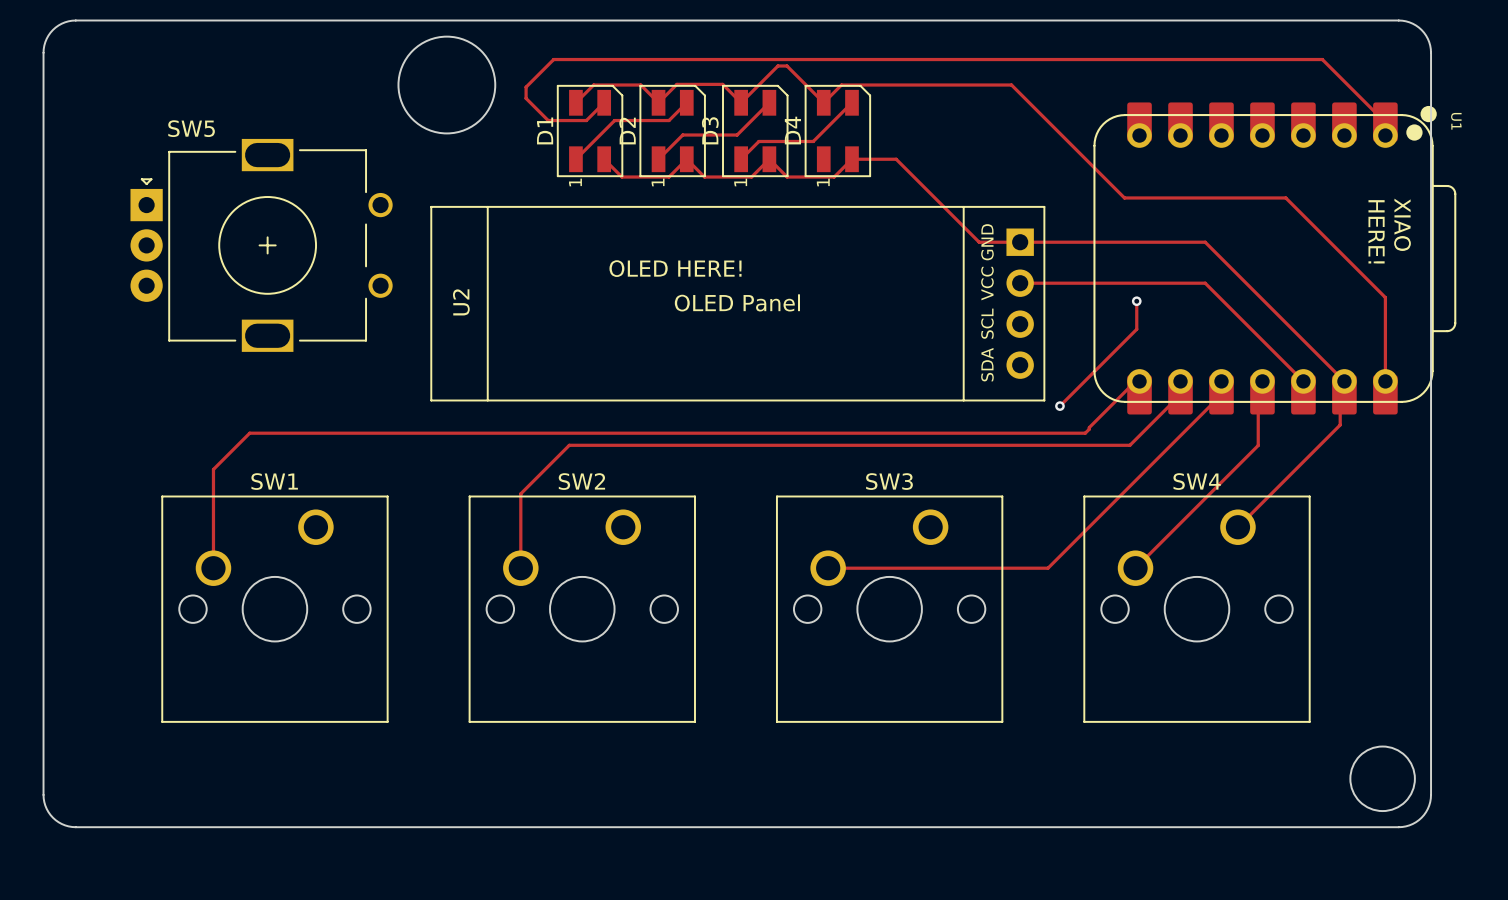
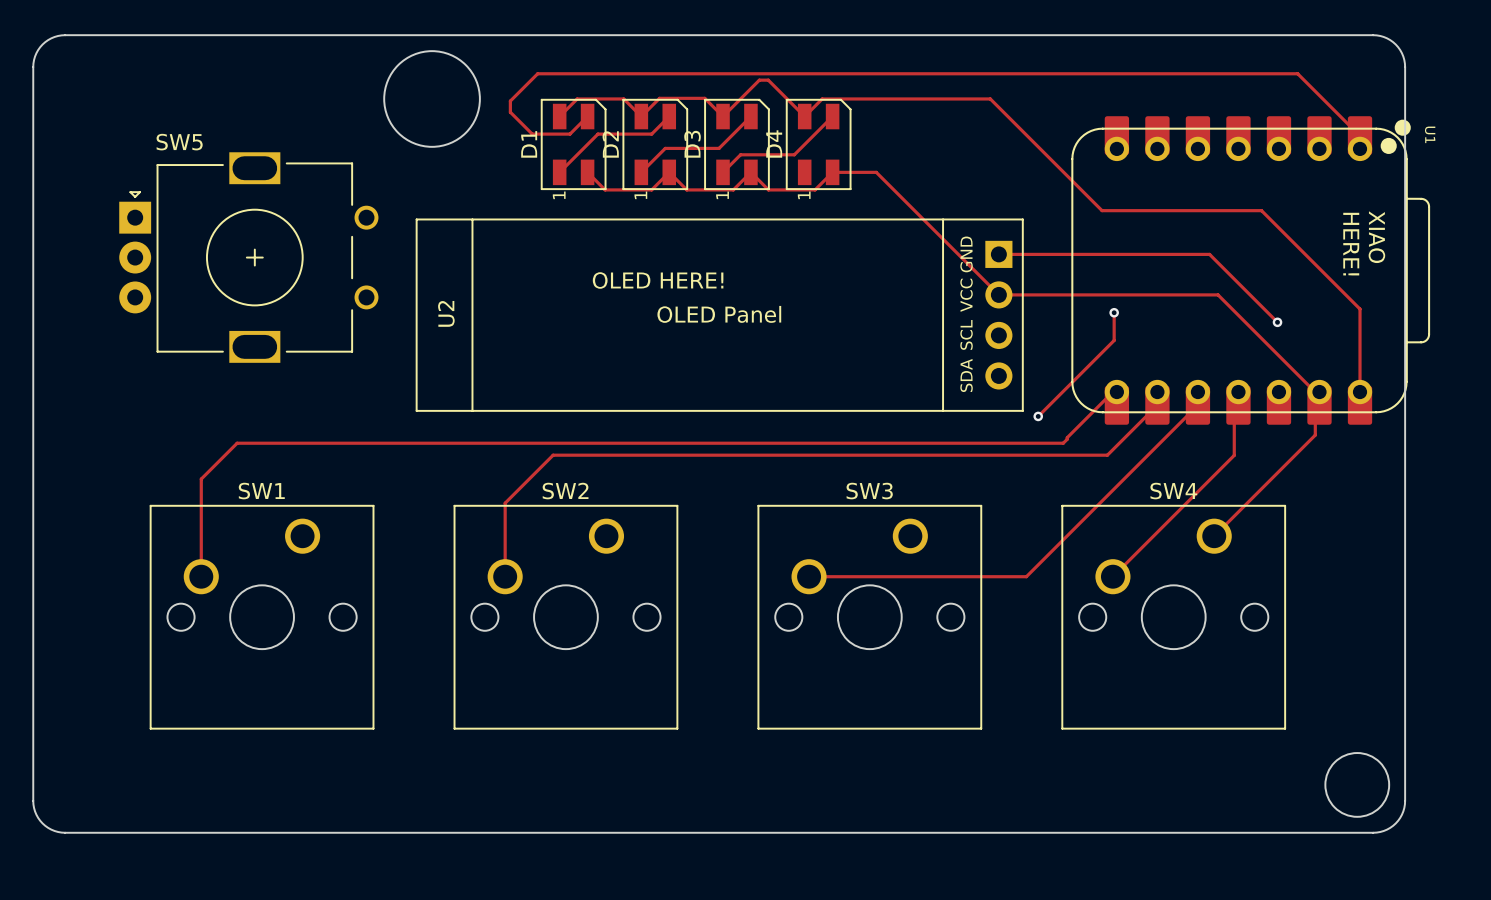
track: (979, 242) (1020, 242) -> (958, 254) (998, 294)
track: (1205, 242) (1344, 381) -> (1181, 254) (1209, 254) (1277, 322)
track: (1205, 283) (1303, 381) -> (1181, 294) (1218, 294) (1315, 392)
via: none -> (1277, 322)

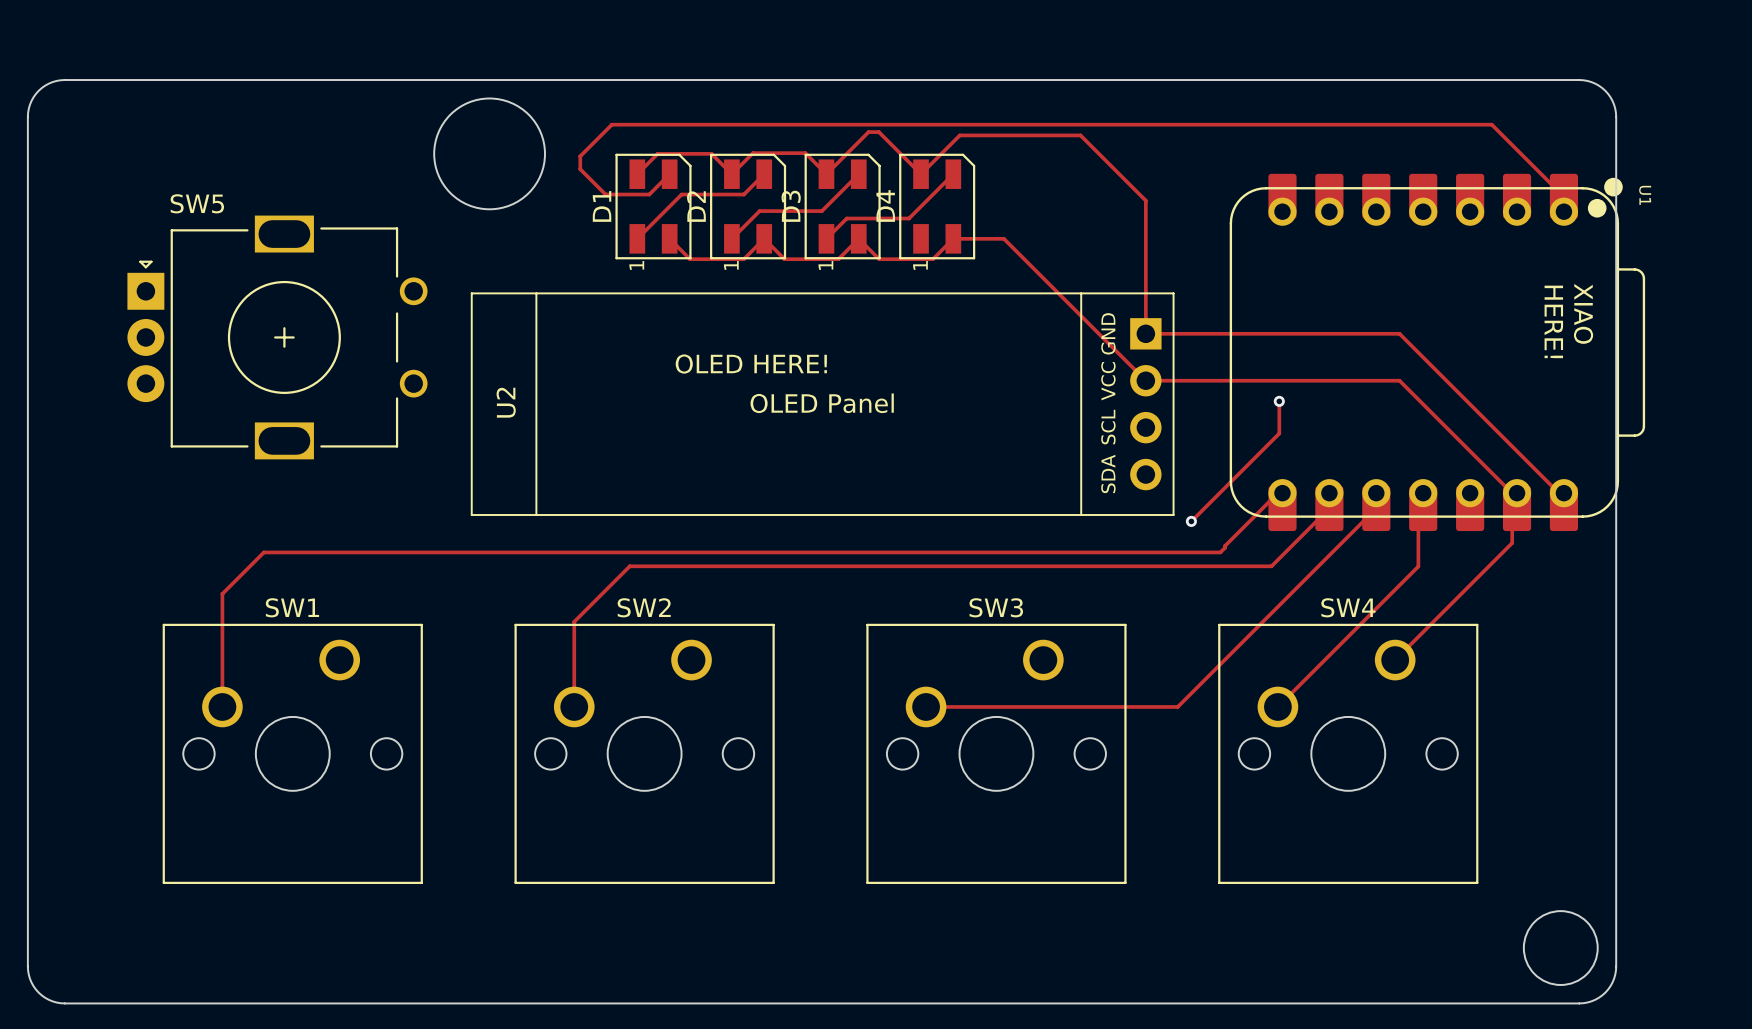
track: (822, 98) (990, 98) (1102, 210) (1261, 210) (1360, 309) (1360, 392) -> (941, 153) (959, 135) (1080, 135) (1145, 200) (1145, 333)
track: (1209, 254) (1277, 322) -> (1389, 333) (1399, 333) (1559, 493)
via: (1277, 322) -> none

